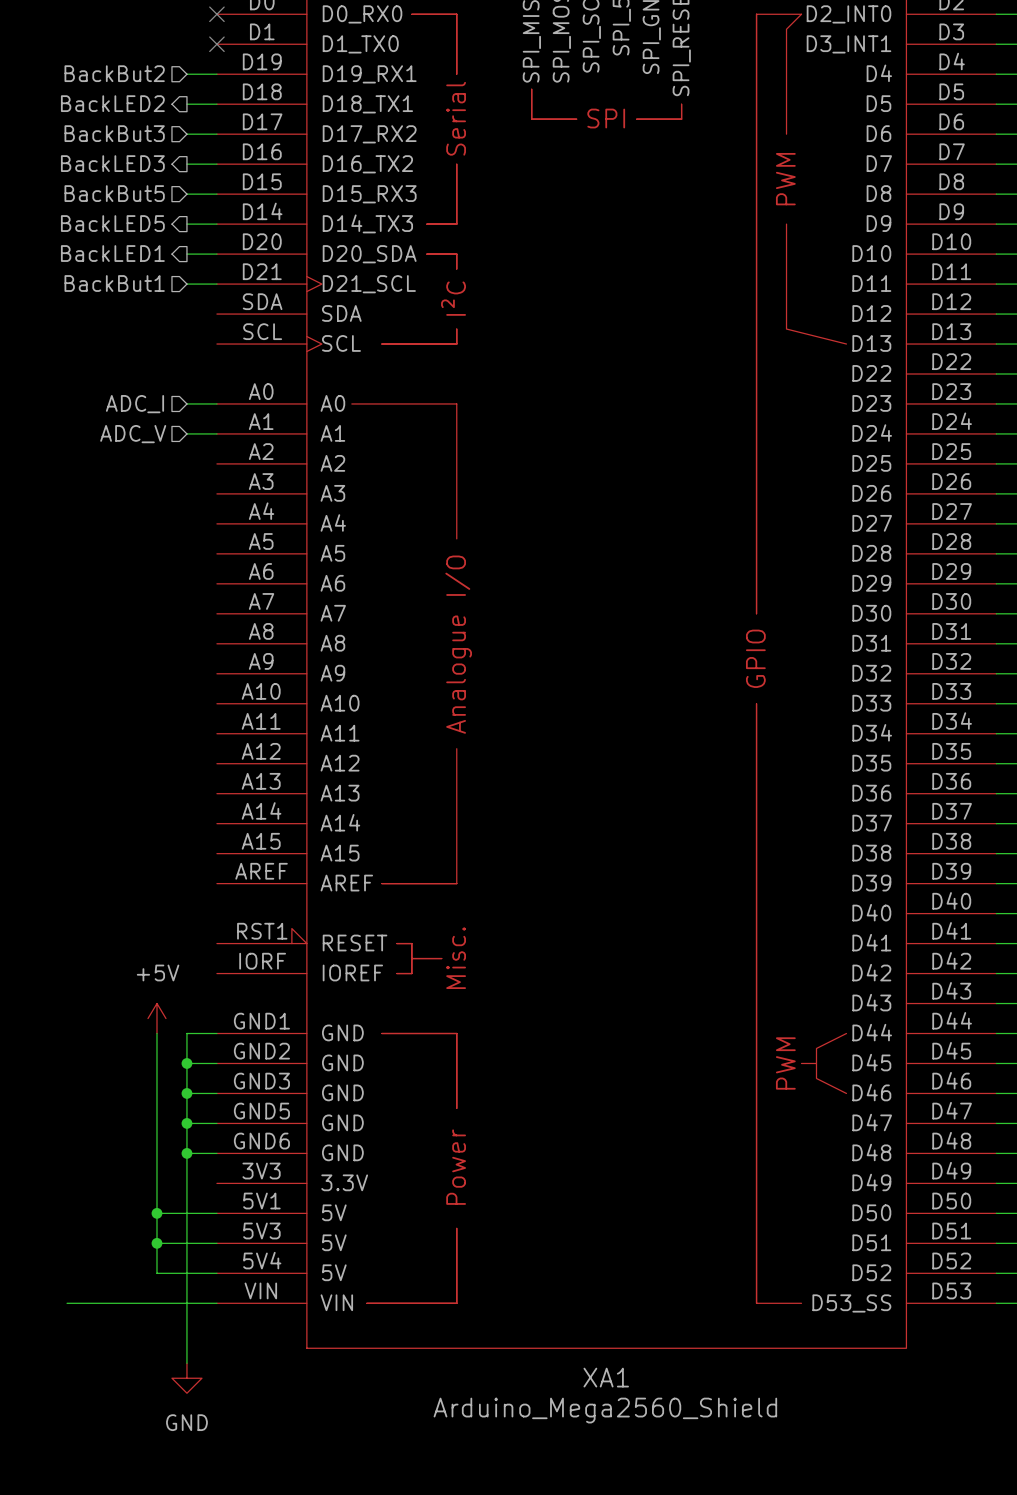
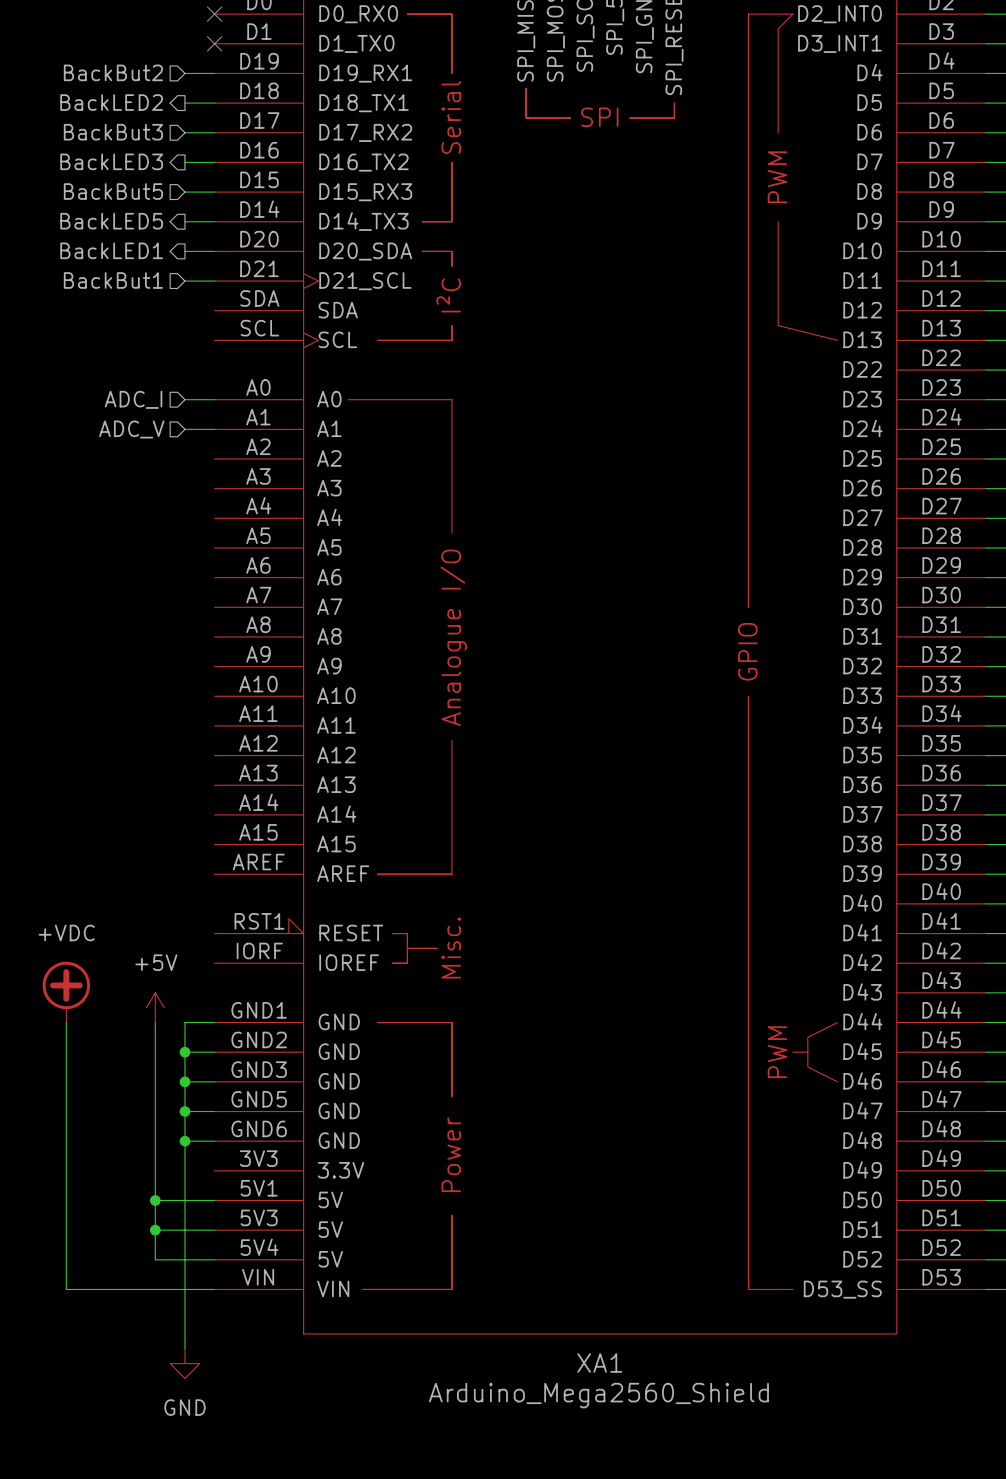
power symbol: none -> +VDC (66, 992)
wire: none -> (66, 1022) (66, 1289)

